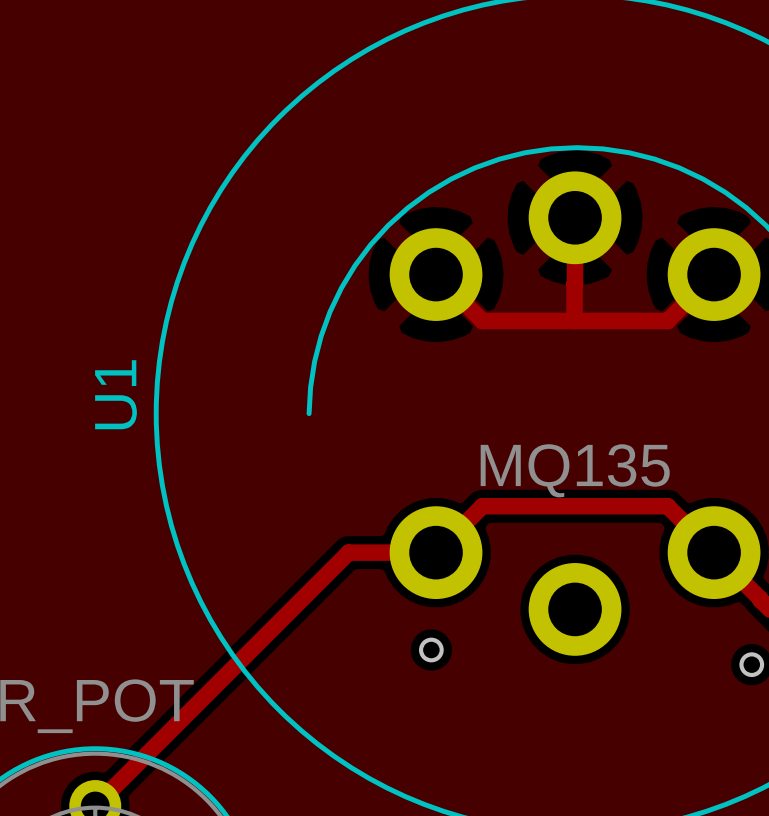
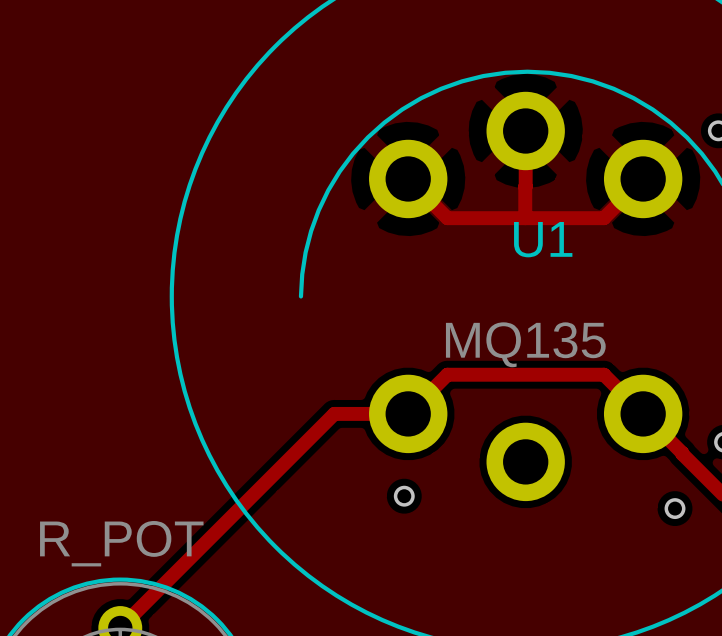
U1 name rotation: 0° (116, 394) -> 90° clockwise (543, 239)
U1 name position: U1 (116, 394) -> U1 (543, 239)

